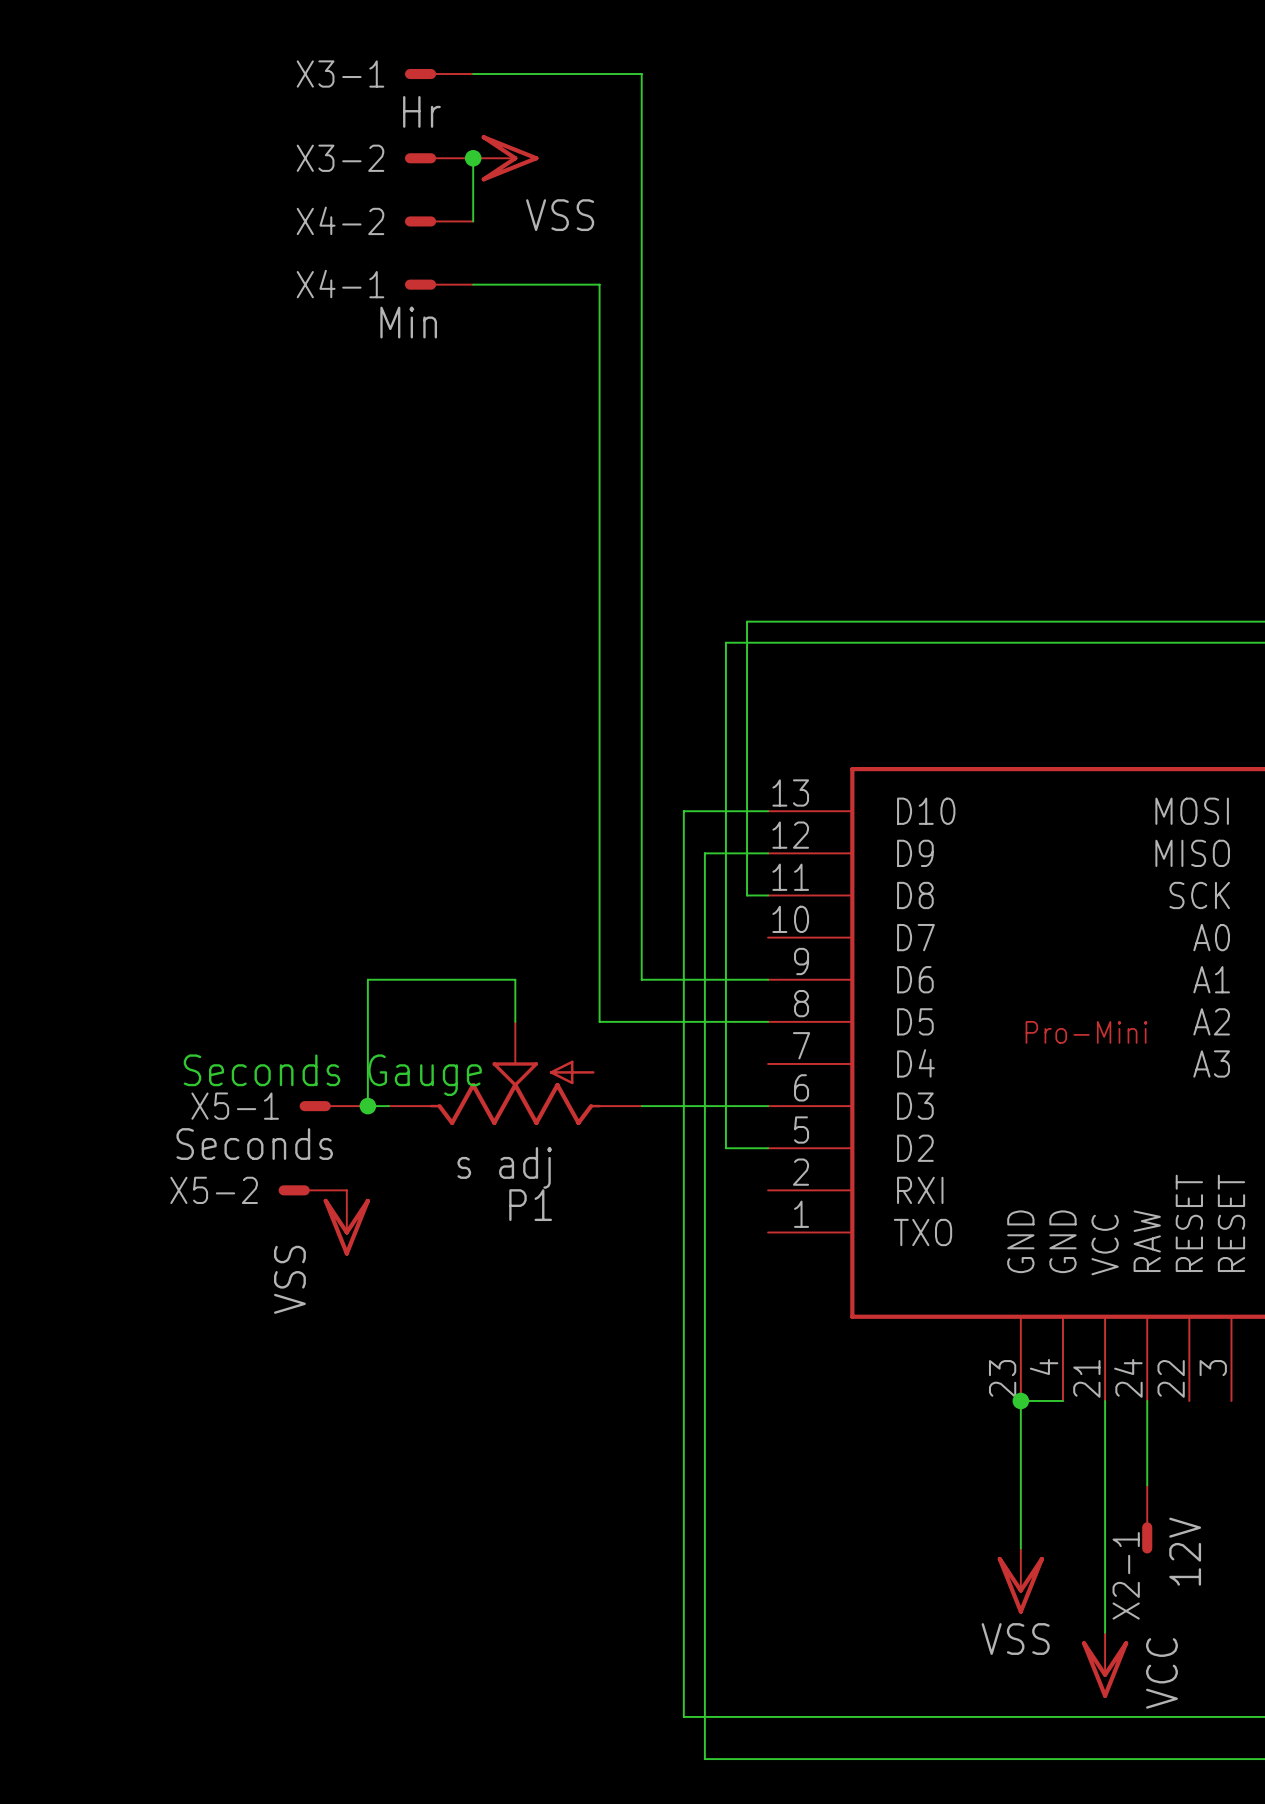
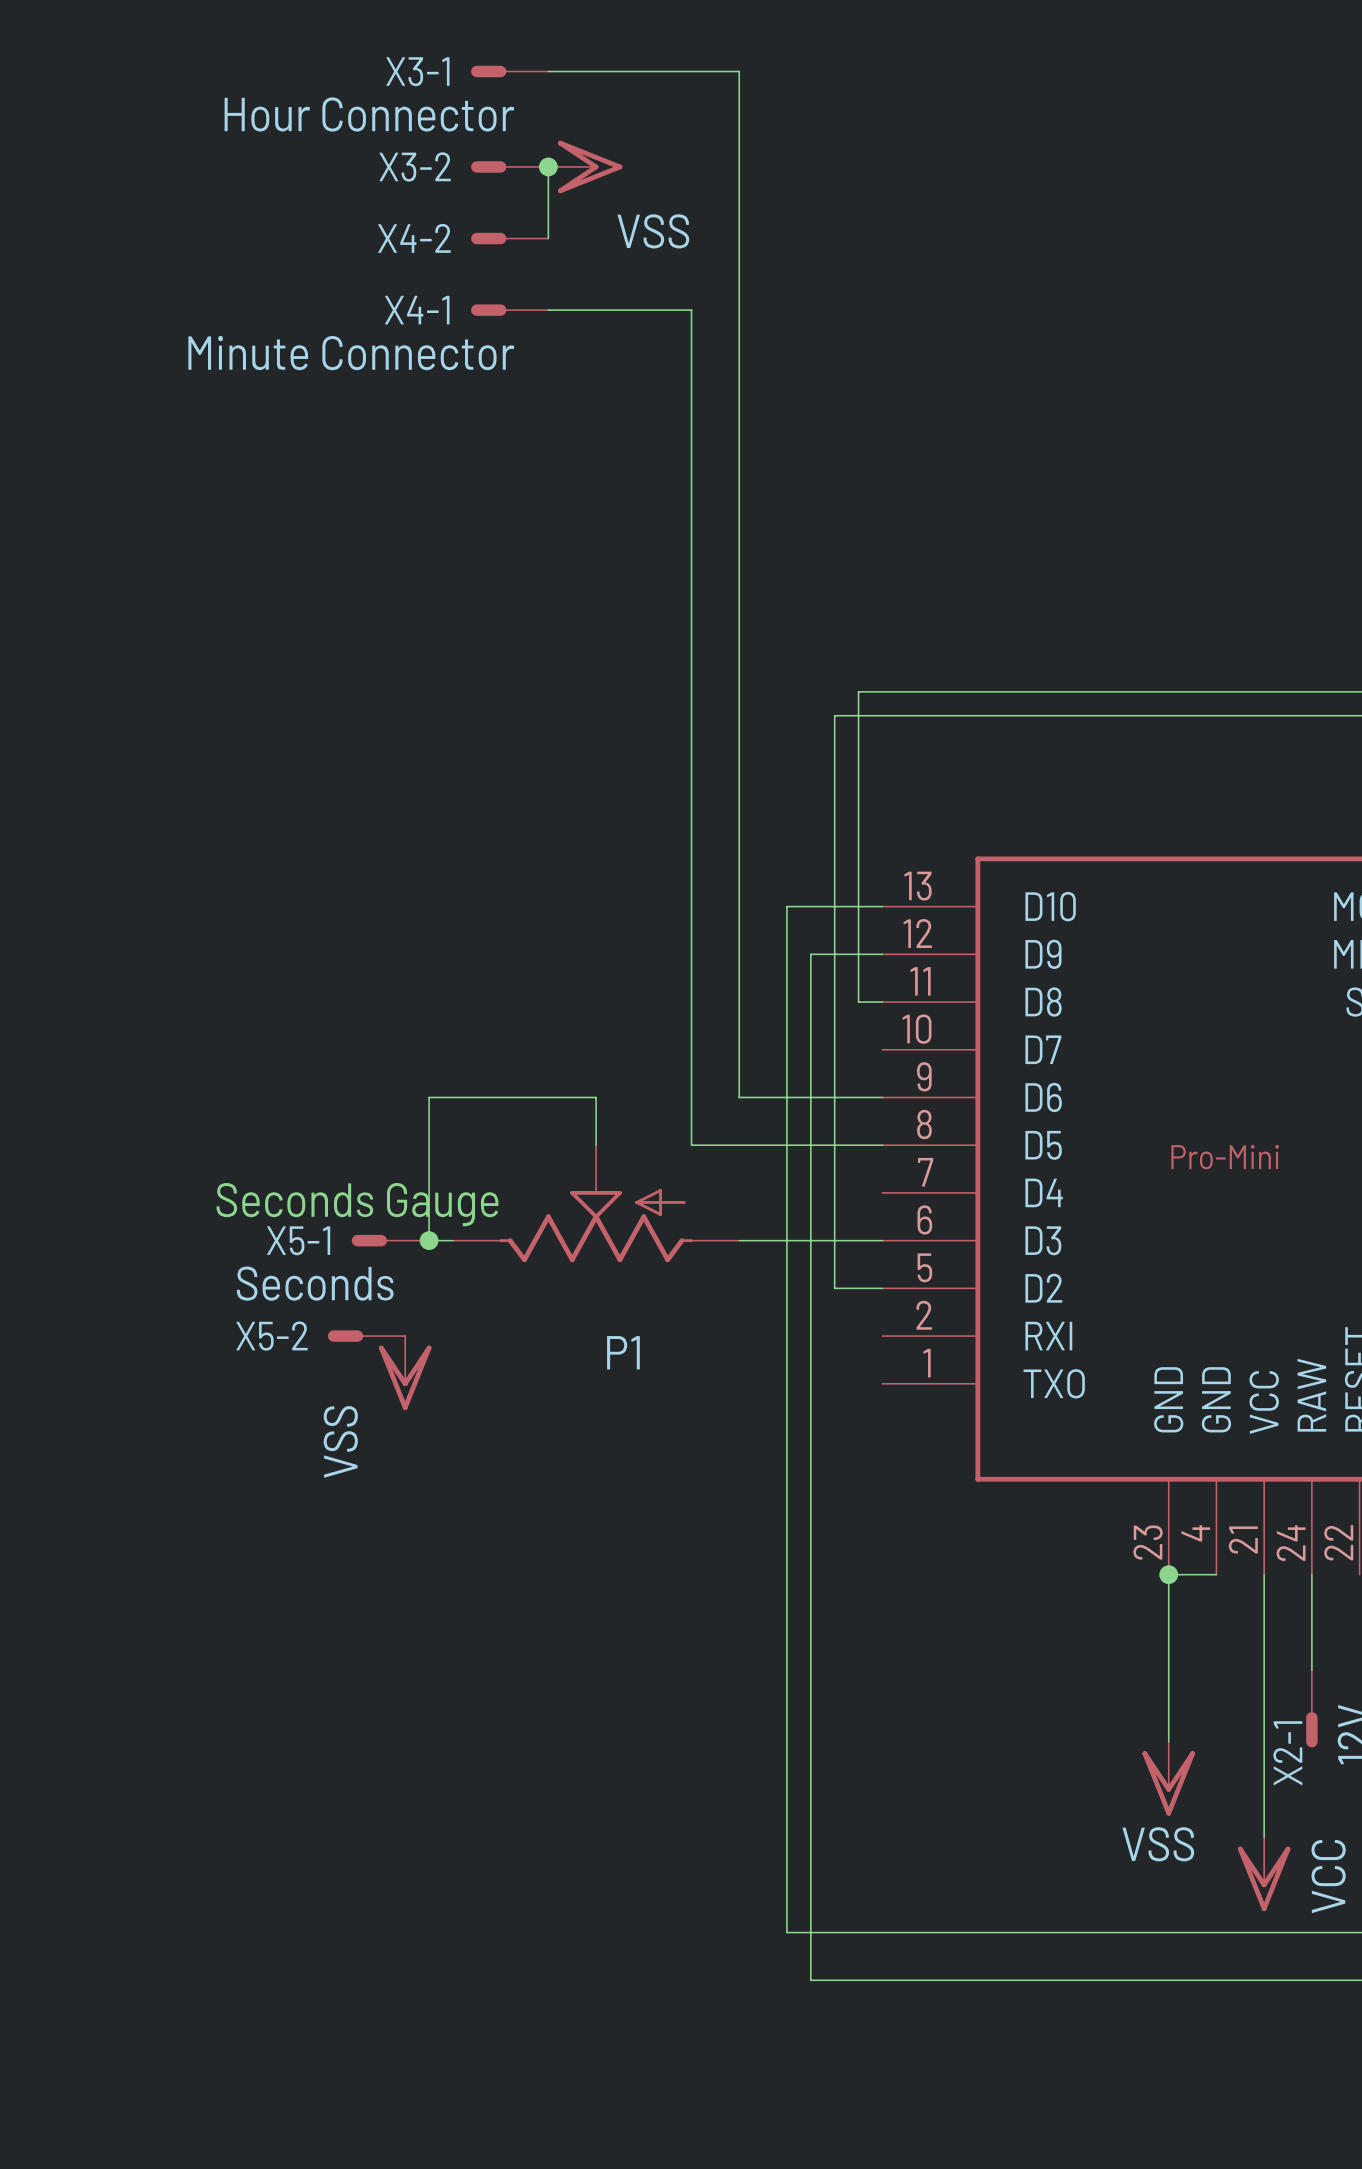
X3-1 value: Hr (421, 111) -> Hour Connector (369, 114)
X4-1 value: Min (408, 322) -> Minute Connector (351, 353)
P1 value: s adj (504, 1167) -> none

